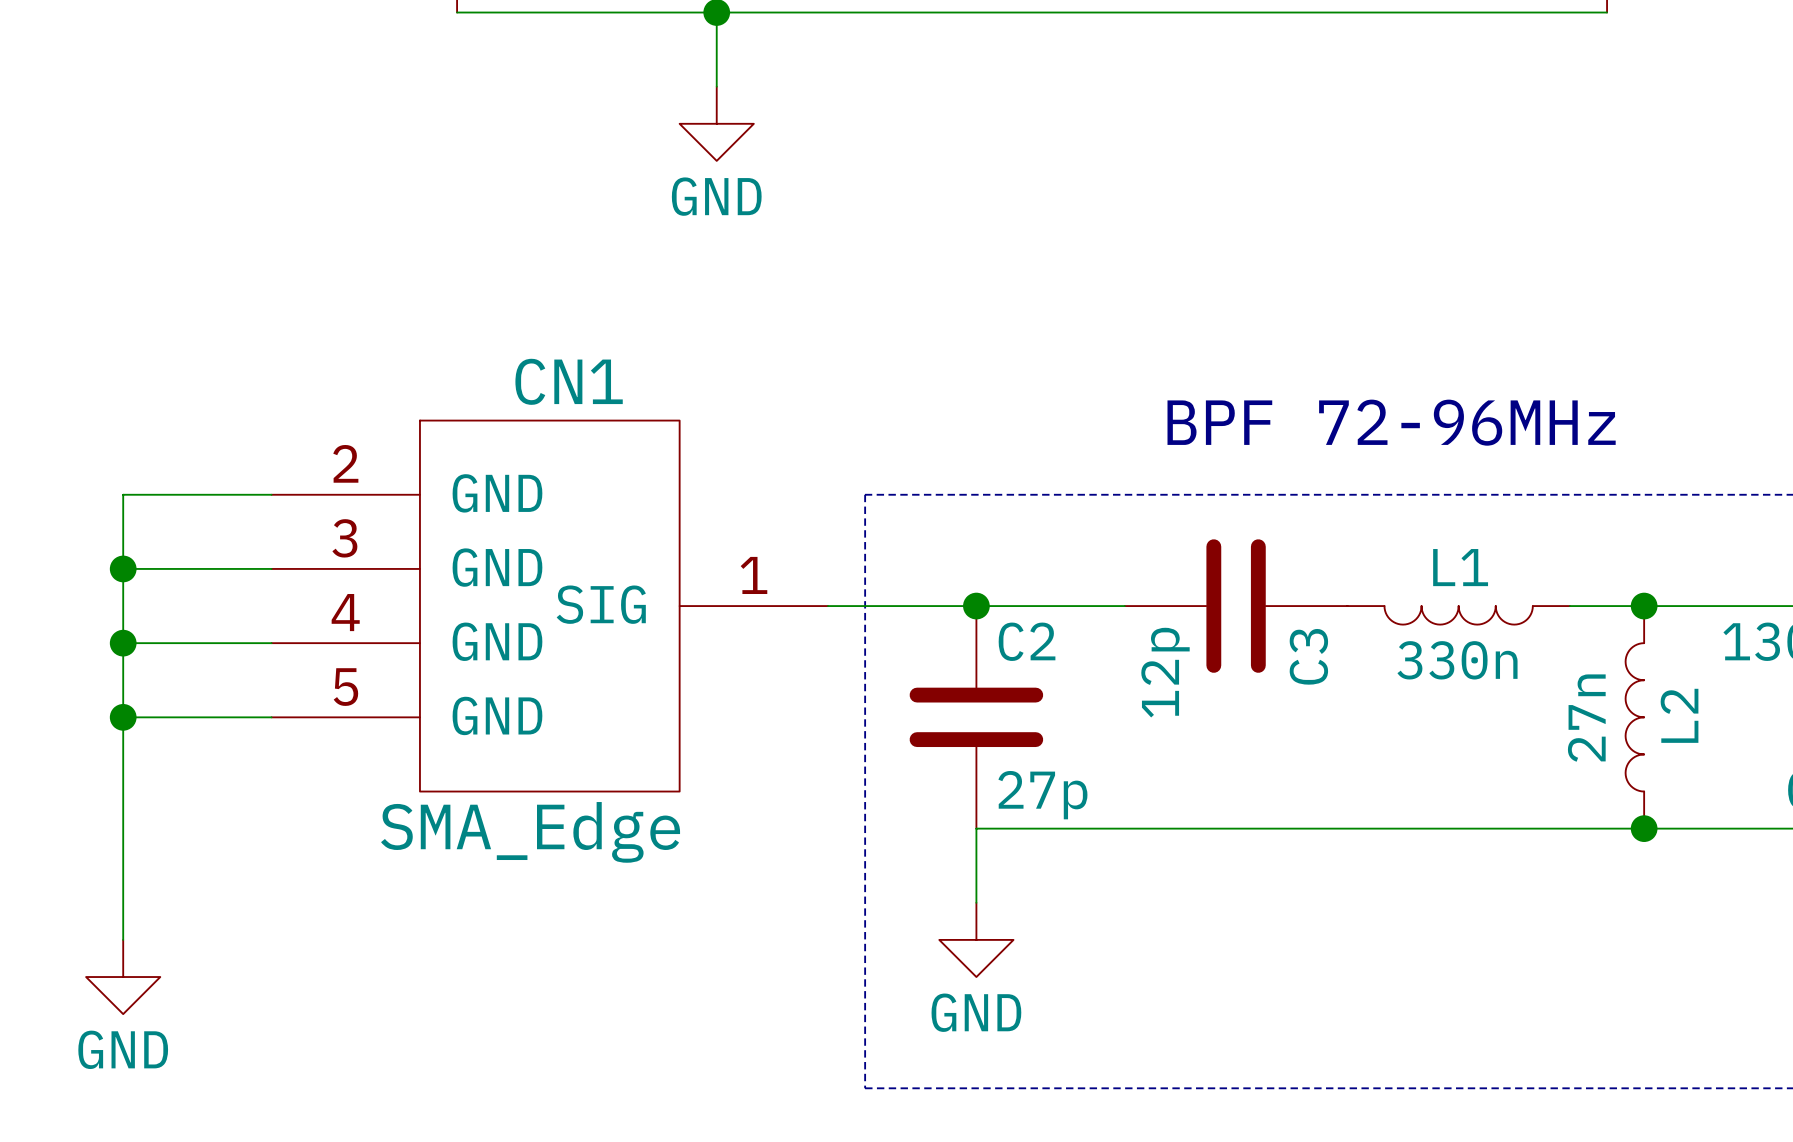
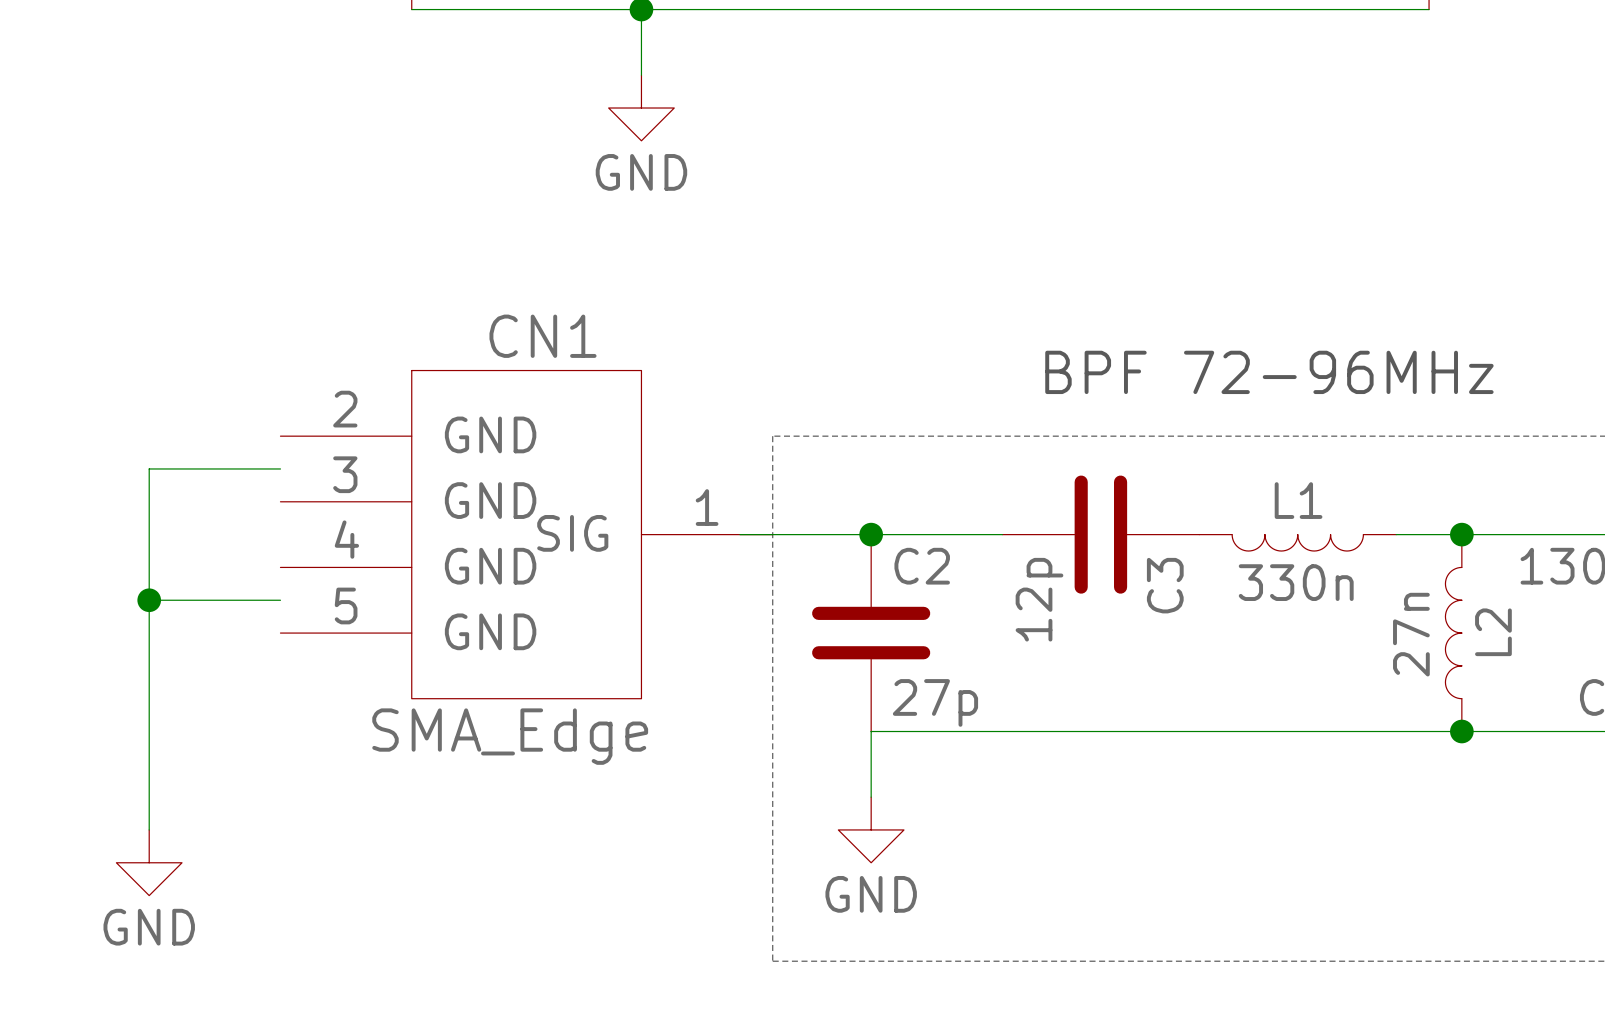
wire: (271, 494) (123, 494) (123, 939) -> none
wire: none -> (280, 468) (149, 468) (149, 829)
wire: (123, 568) (271, 568) -> none
junction: (123, 568) -> none
CN1 position: (549, 606) -> (526, 534)
wire: (123, 643) (271, 643) -> (149, 600) (280, 600)
junction: (123, 643) -> none
junction: none -> (149, 600)
wire: (123, 717) (271, 717) -> none
junction: (123, 717) -> none
power symbol position: GND (123, 977) -> GND (149, 862)

